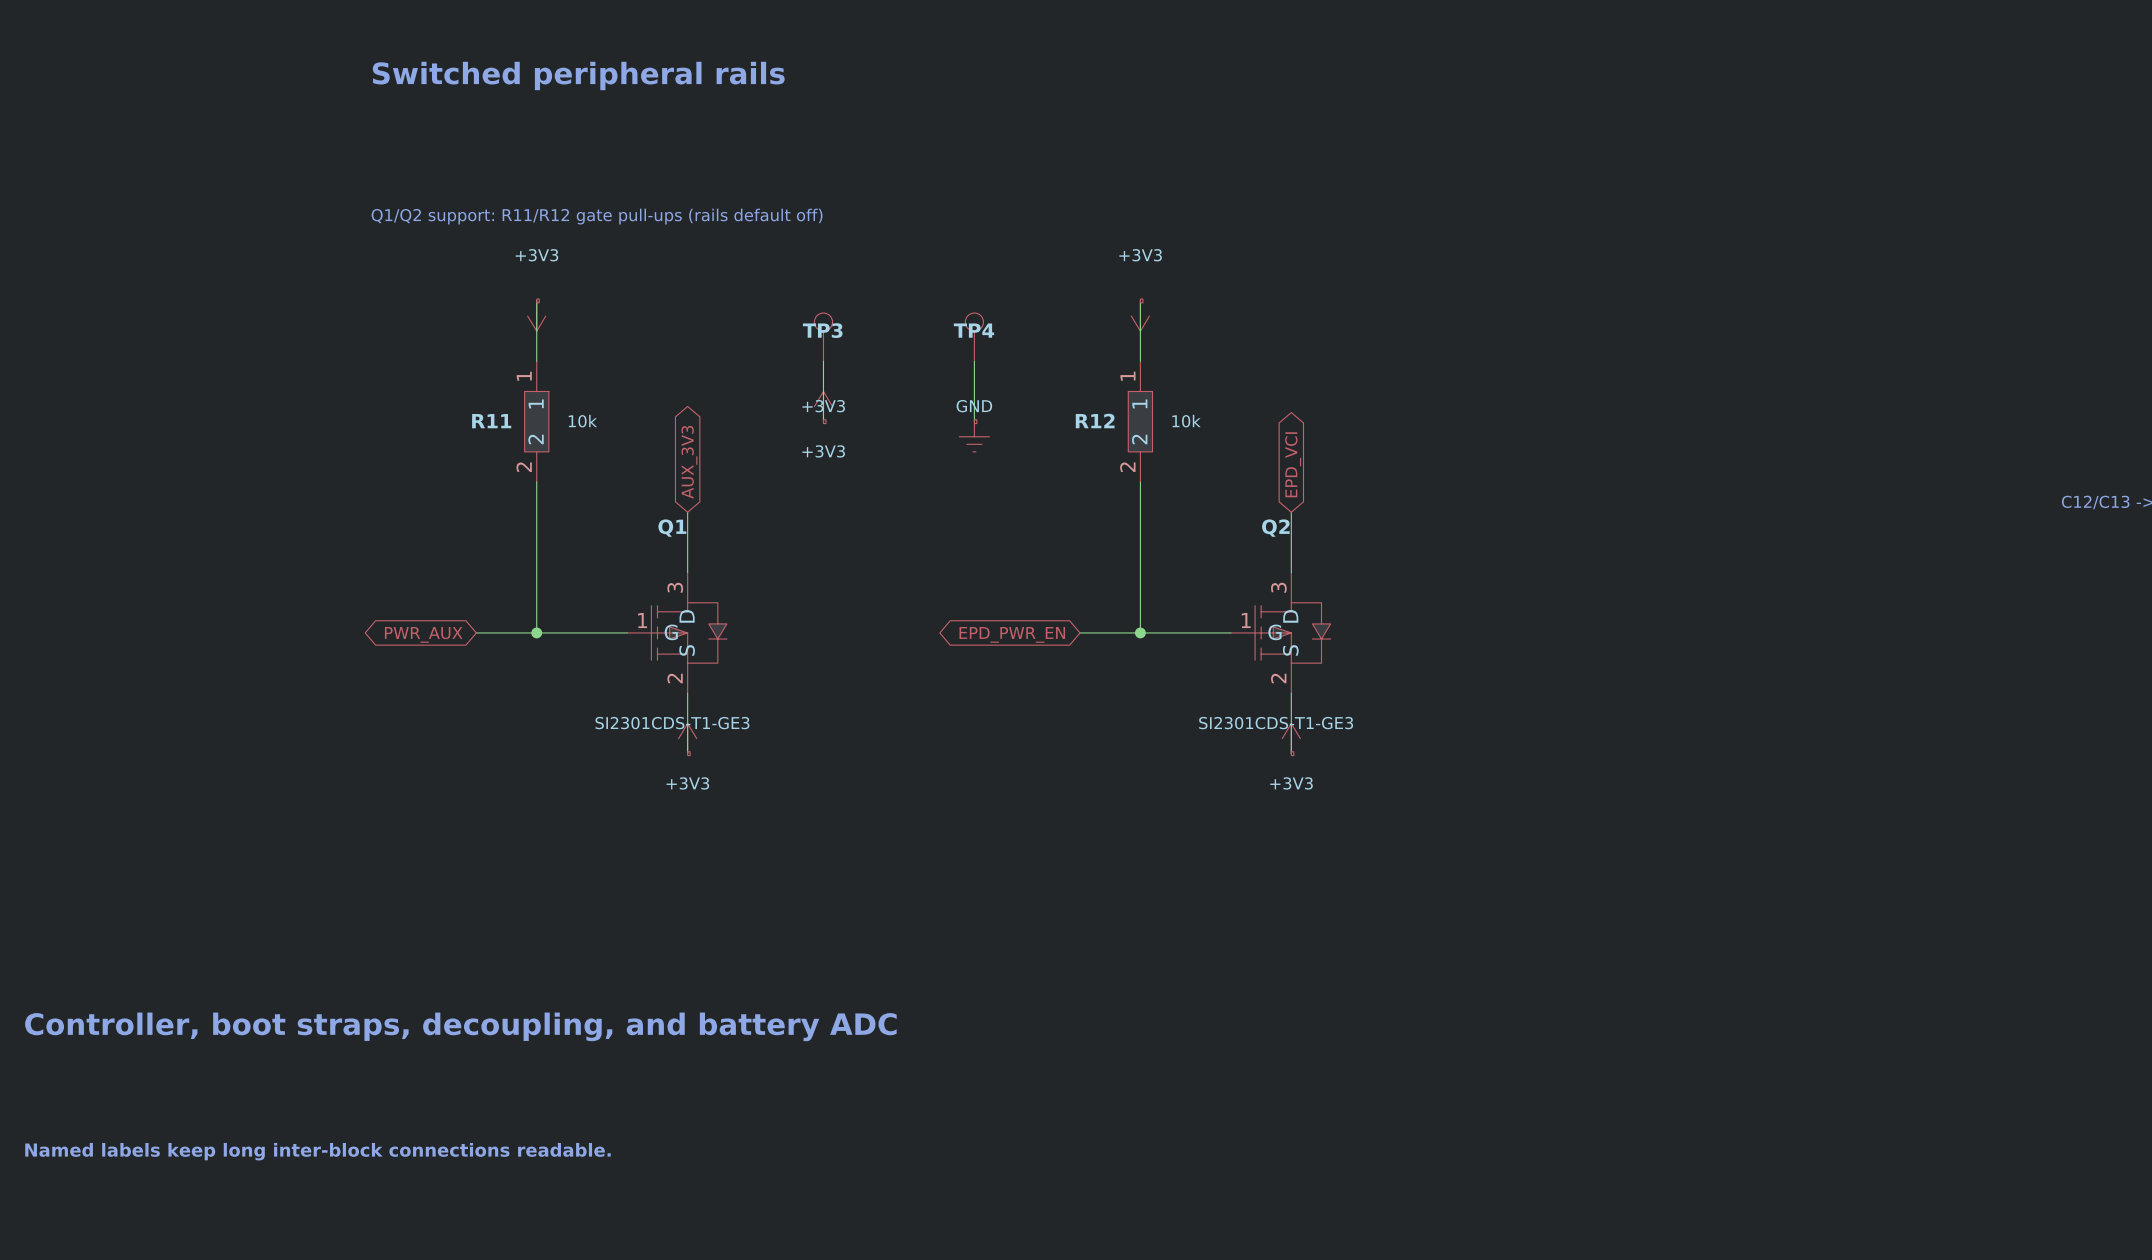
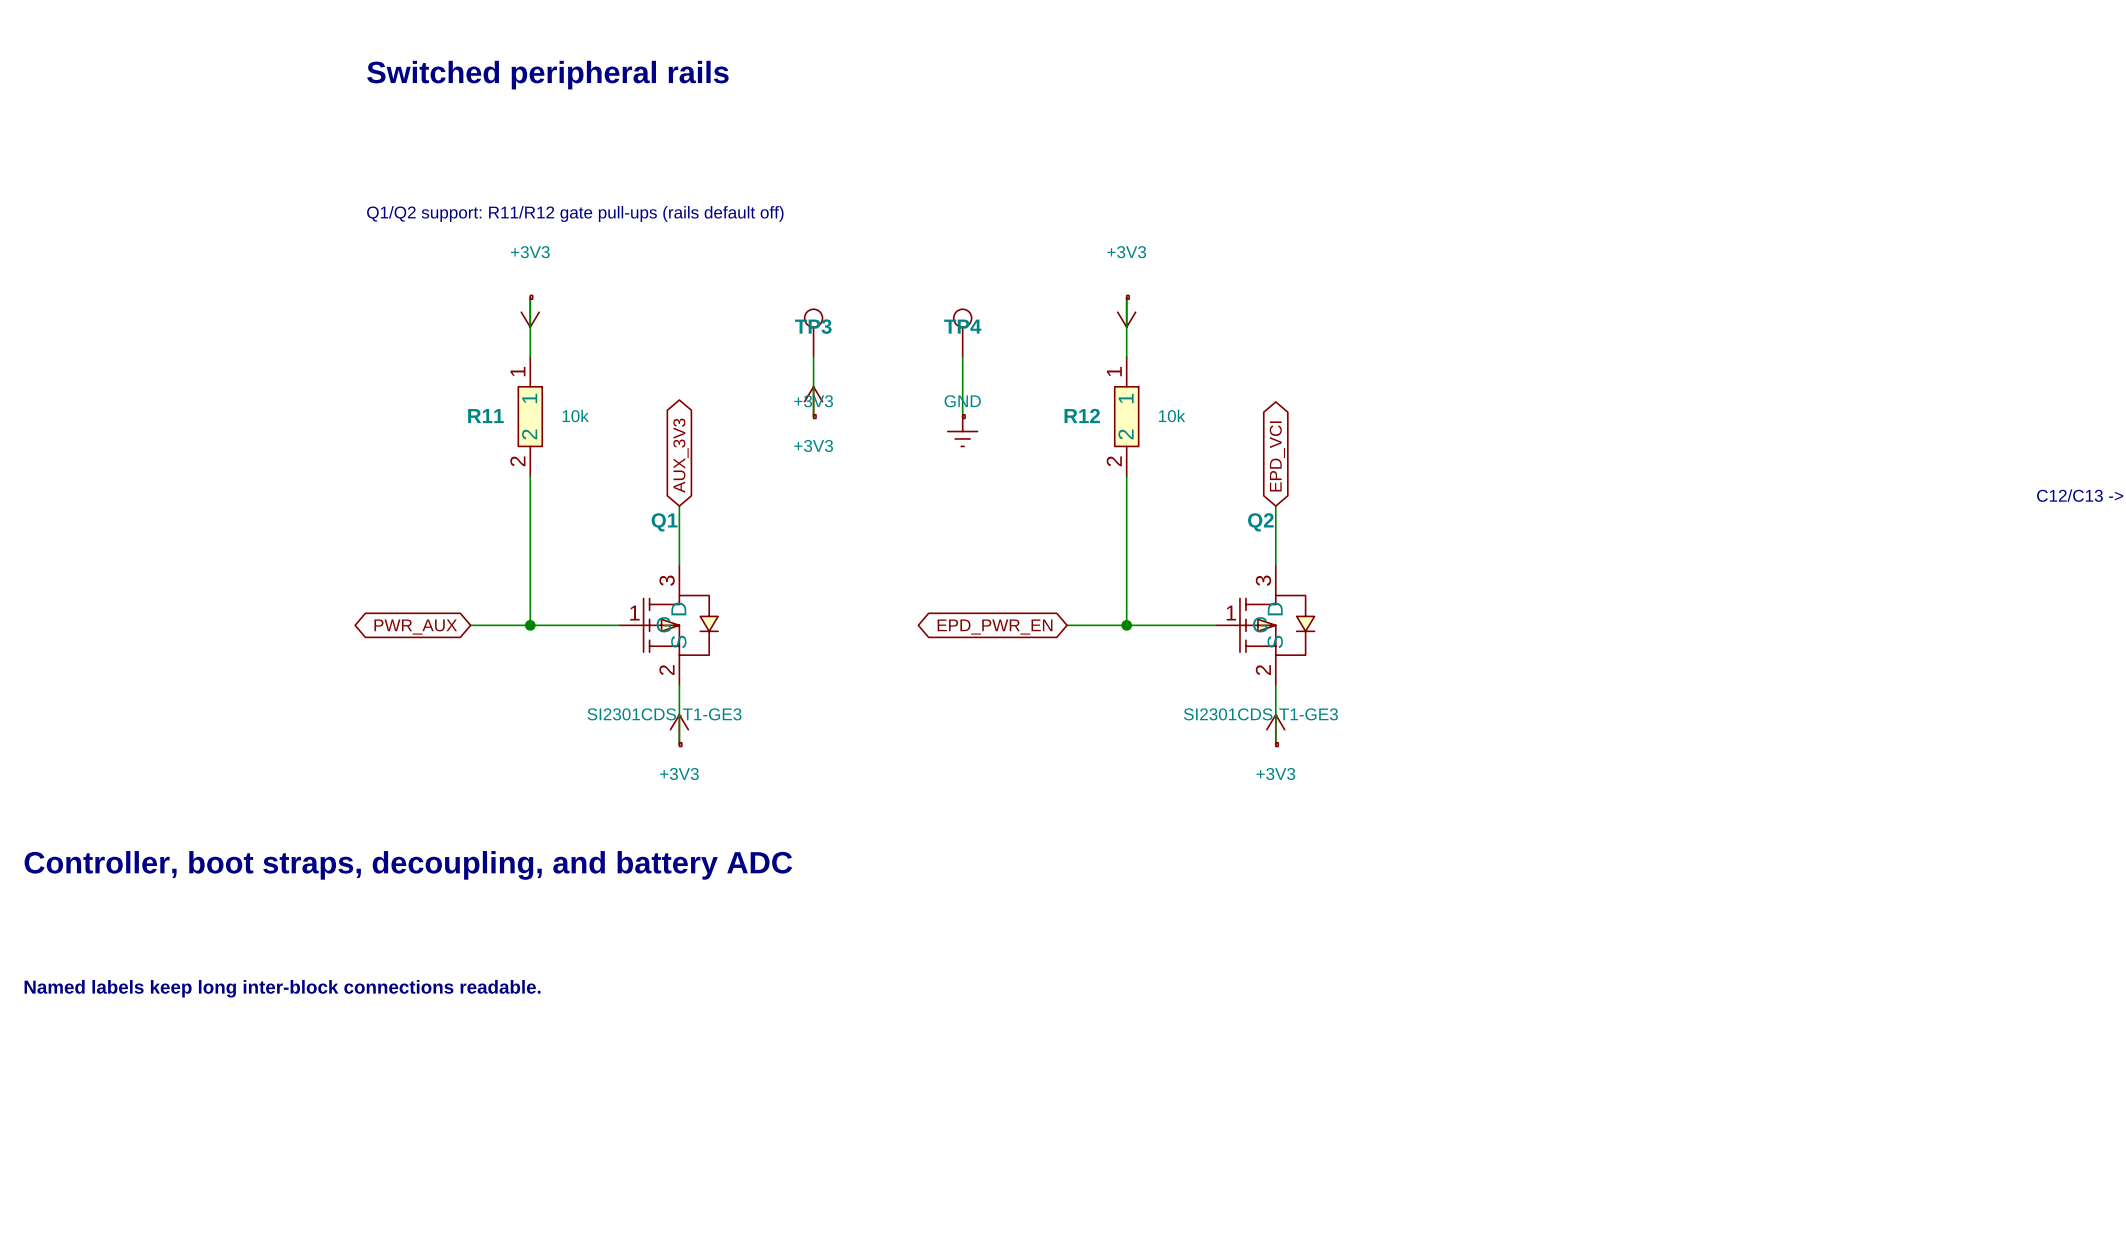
text position: Controller, boot straps, decoupling, and battery ADC (460, 1026) -> Controller, boot straps, decoupling, and battery ADC (408, 865)
text position: Named labels keep long inter-block connections readable. (317, 1151) -> Named labels keep long inter-block connections readable. (282, 988)

